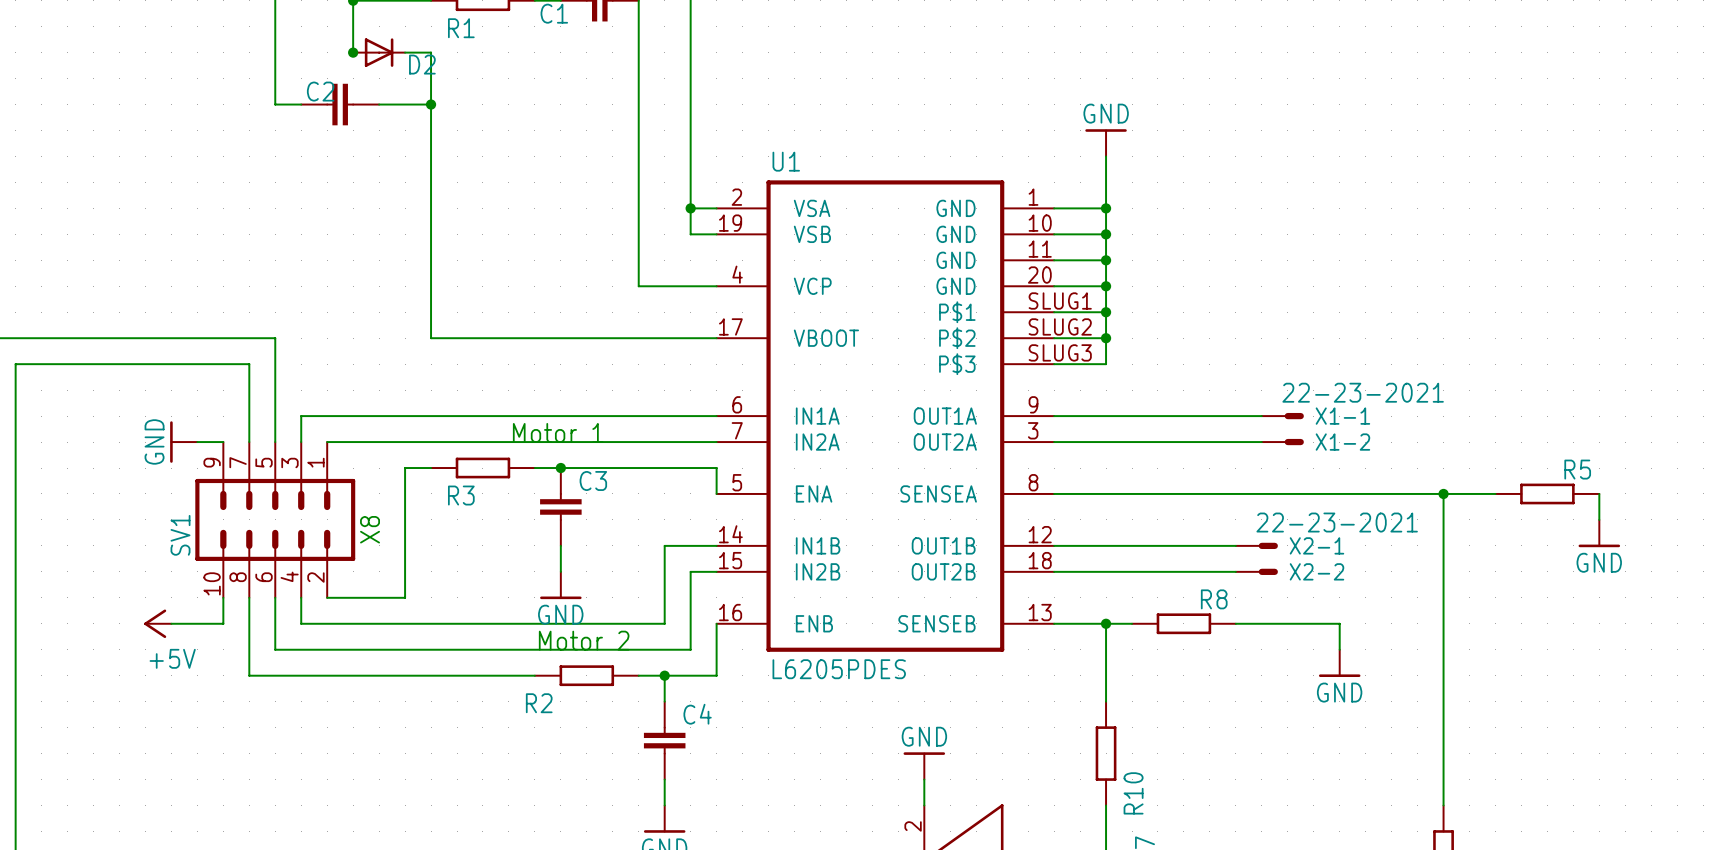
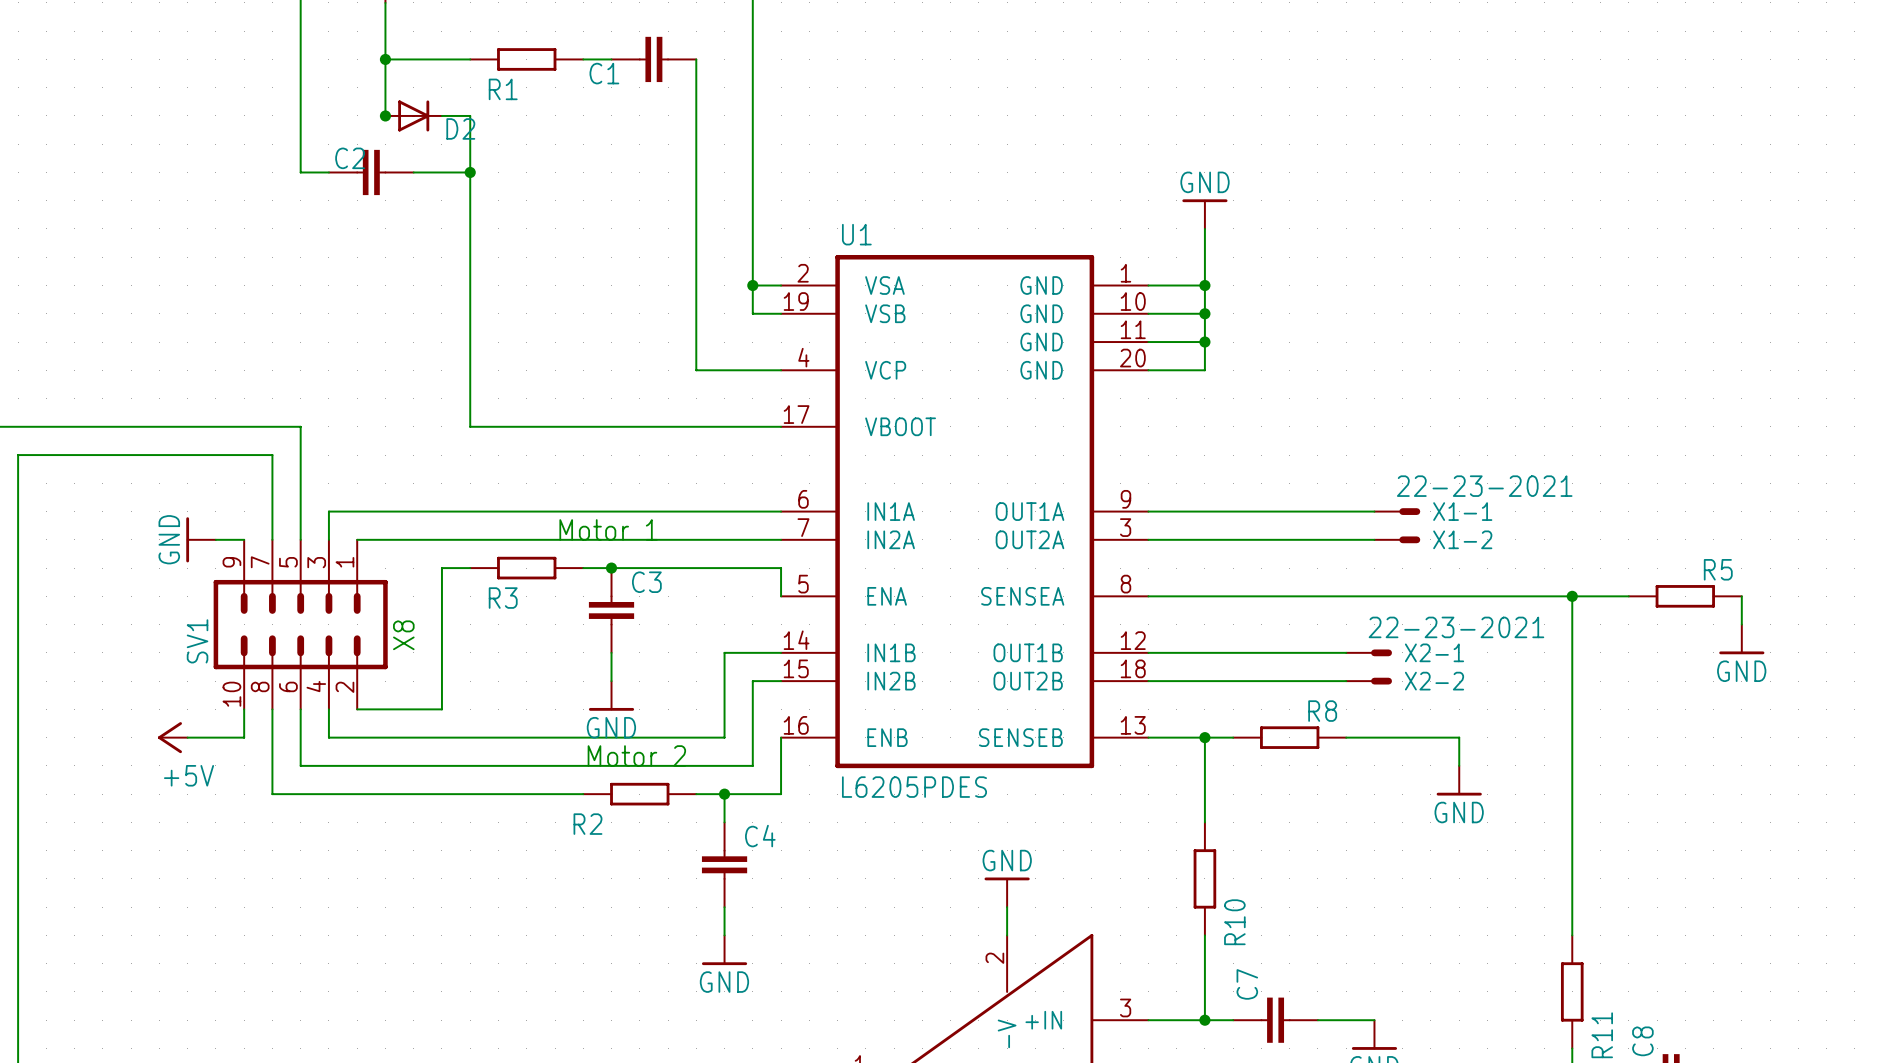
U1 symbol: [716, 180, 1055, 652] -> [781, 254, 1149, 769]
wire: (1106, 286) (1106, 364) (1054, 364) -> none
junction: (1106, 286) -> none
wire: (1054, 312) (1106, 312) -> none
junction: (1106, 312) -> none
wire: (1054, 338) (1106, 338) -> none
junction: (1106, 338) -> none

